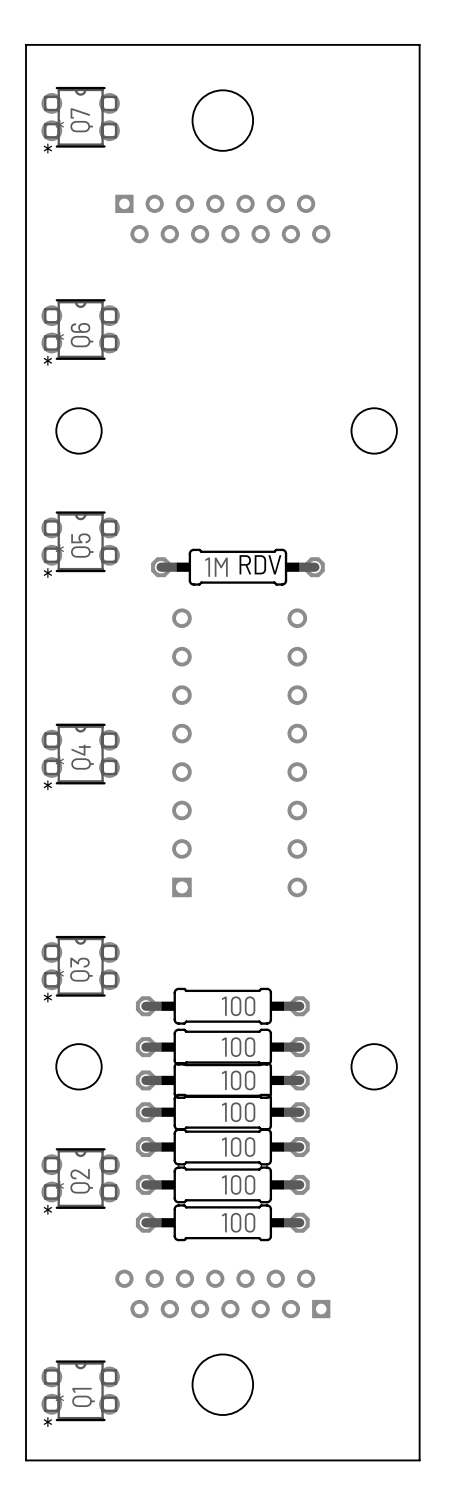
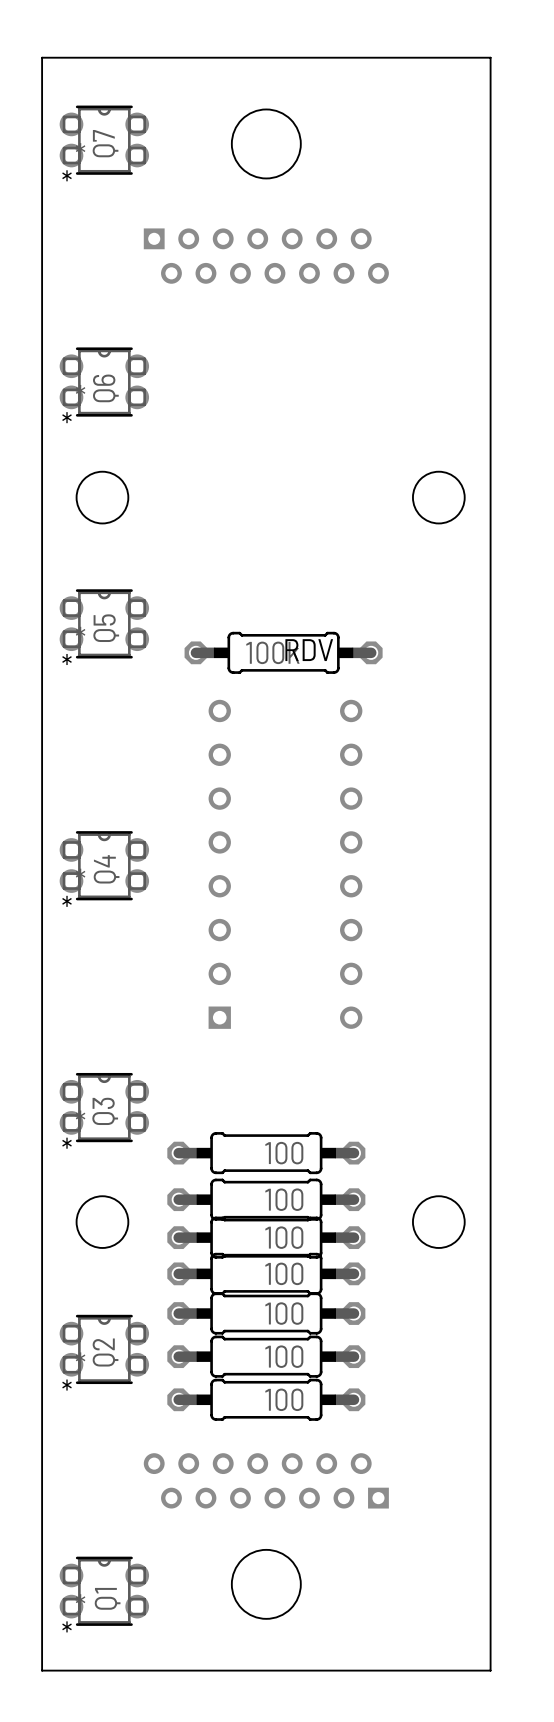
RDV value: 1M (216, 567) -> 100k (272, 652)

